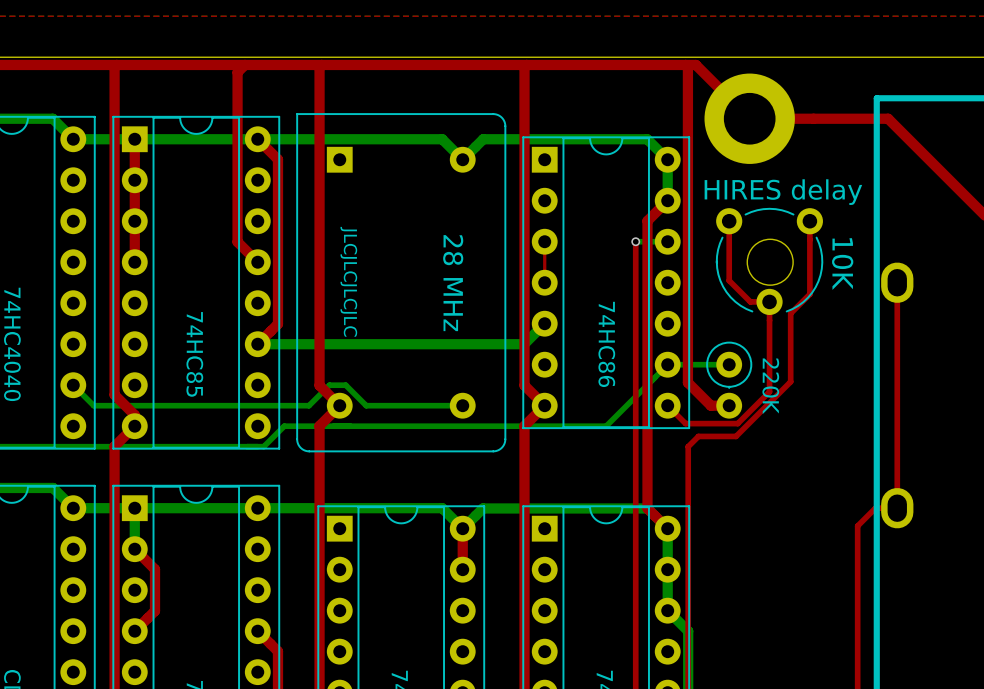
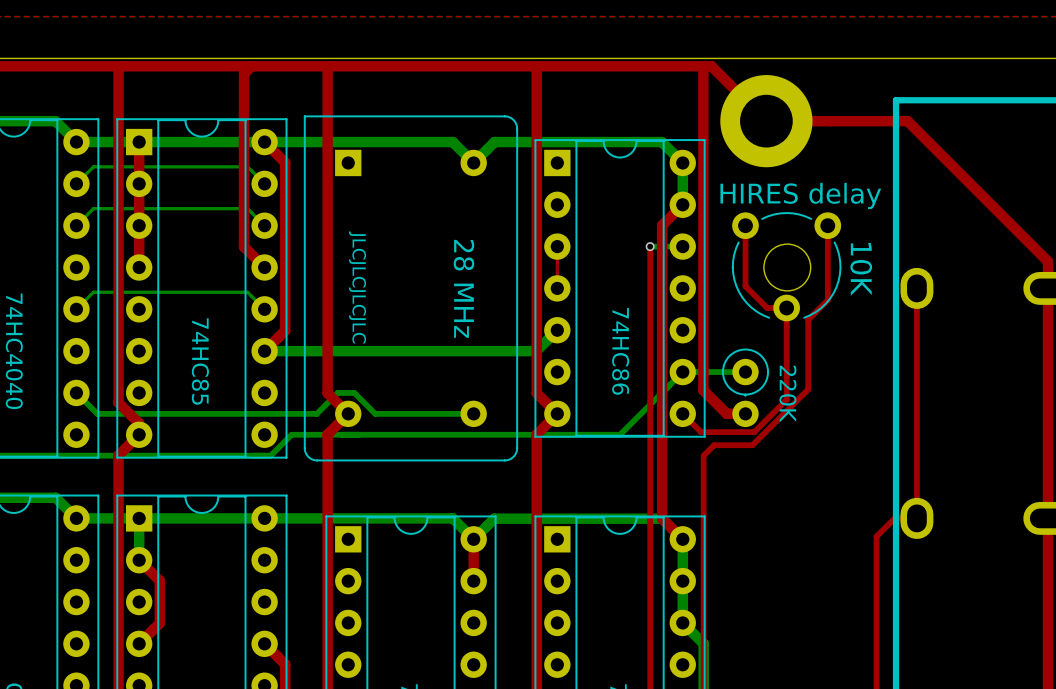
bottom track: none -> (76, 183) (93, 166) (247, 166) (264, 183)
bottom track: none -> (76, 225) (93, 208) (247, 208) (264, 225)
bottom track: none -> (76, 309) (93, 292) (247, 292) (264, 309)

